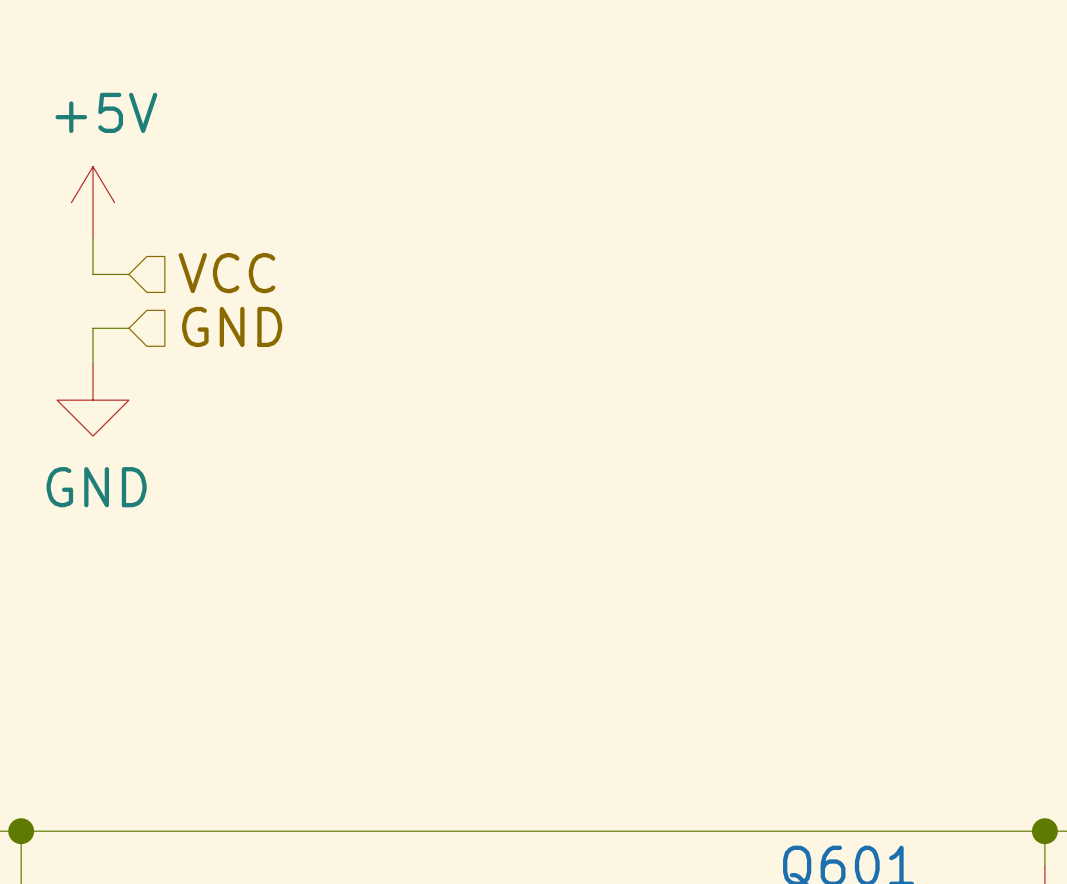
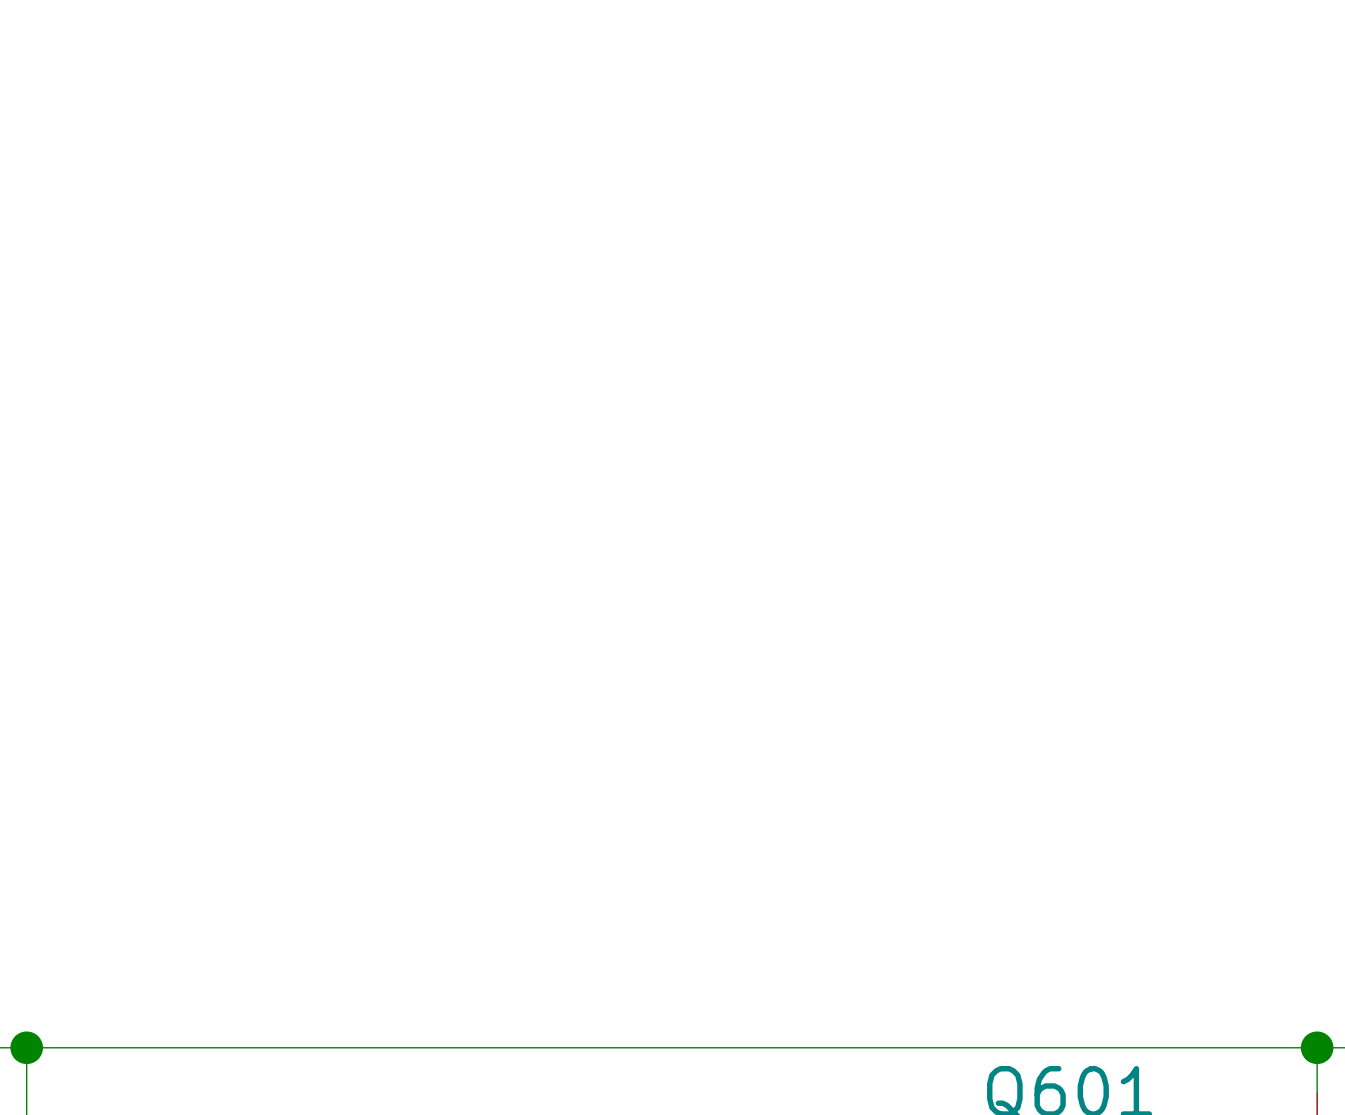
power symbol: +5V (93, 202) -> none
wire: (93, 238) (93, 274) (128, 274) -> none
hierarchical label: VCC (226, 273) -> none
hierarchical label: GND (232, 326) -> none
wire: (128, 328) (93, 328) (93, 364) -> none
power symbol: GND (93, 400) -> none

